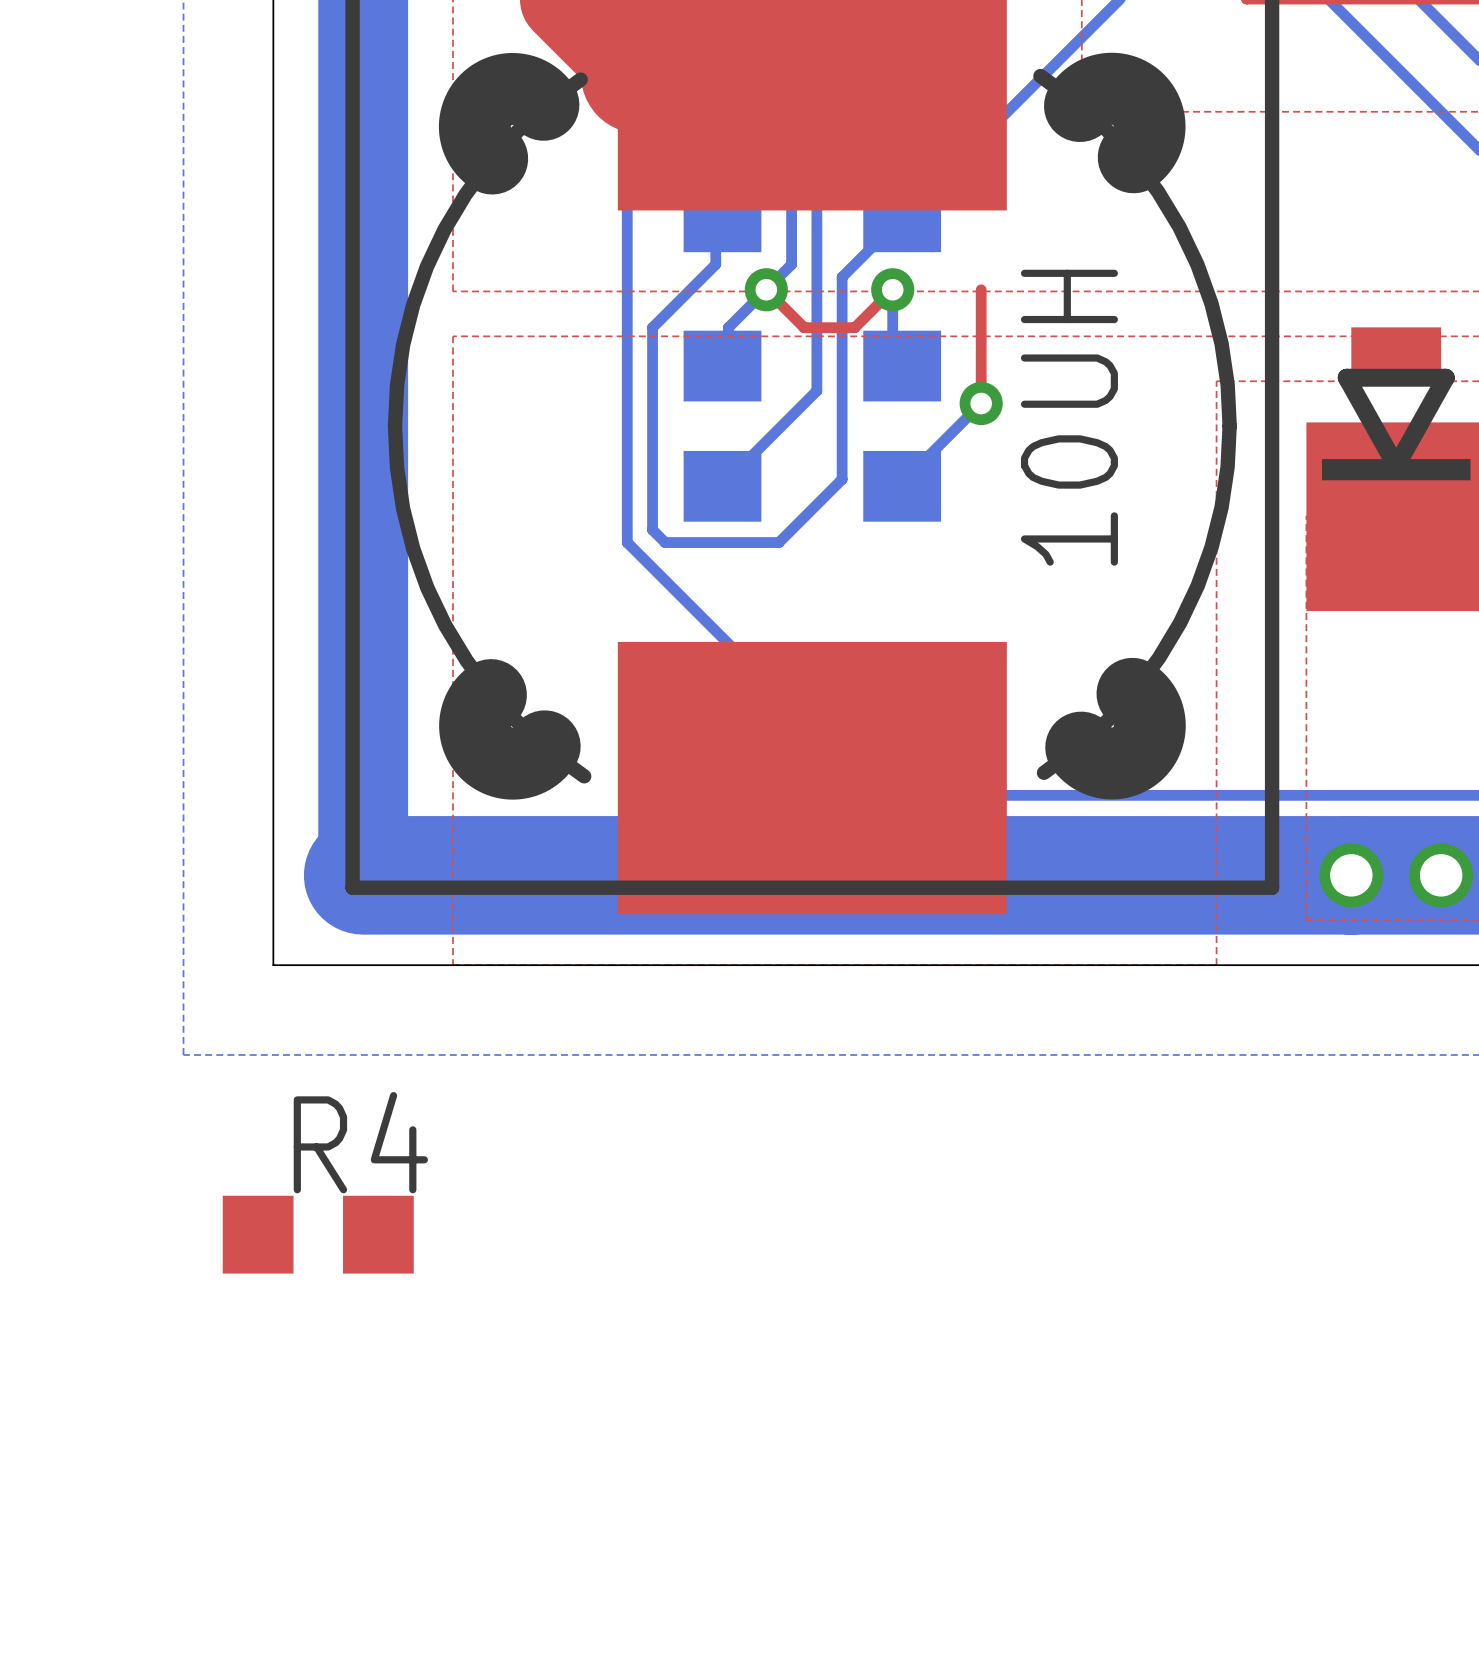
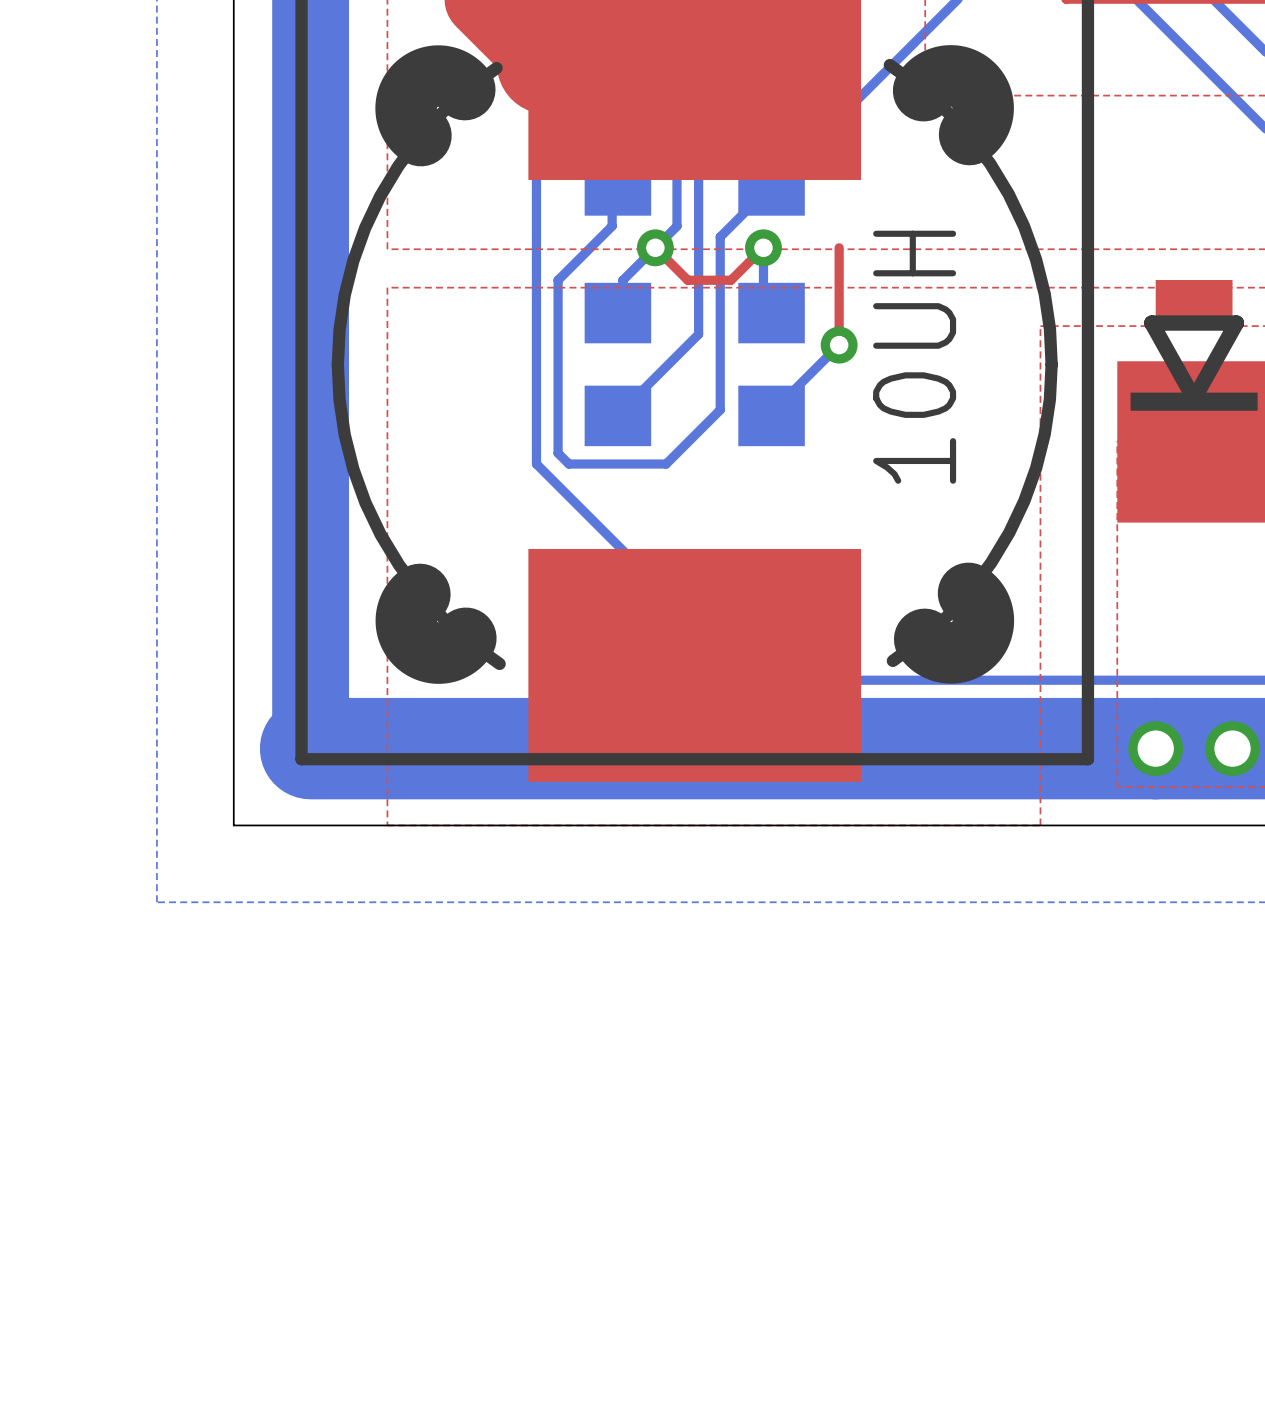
R4: (318, 1234) -> none

